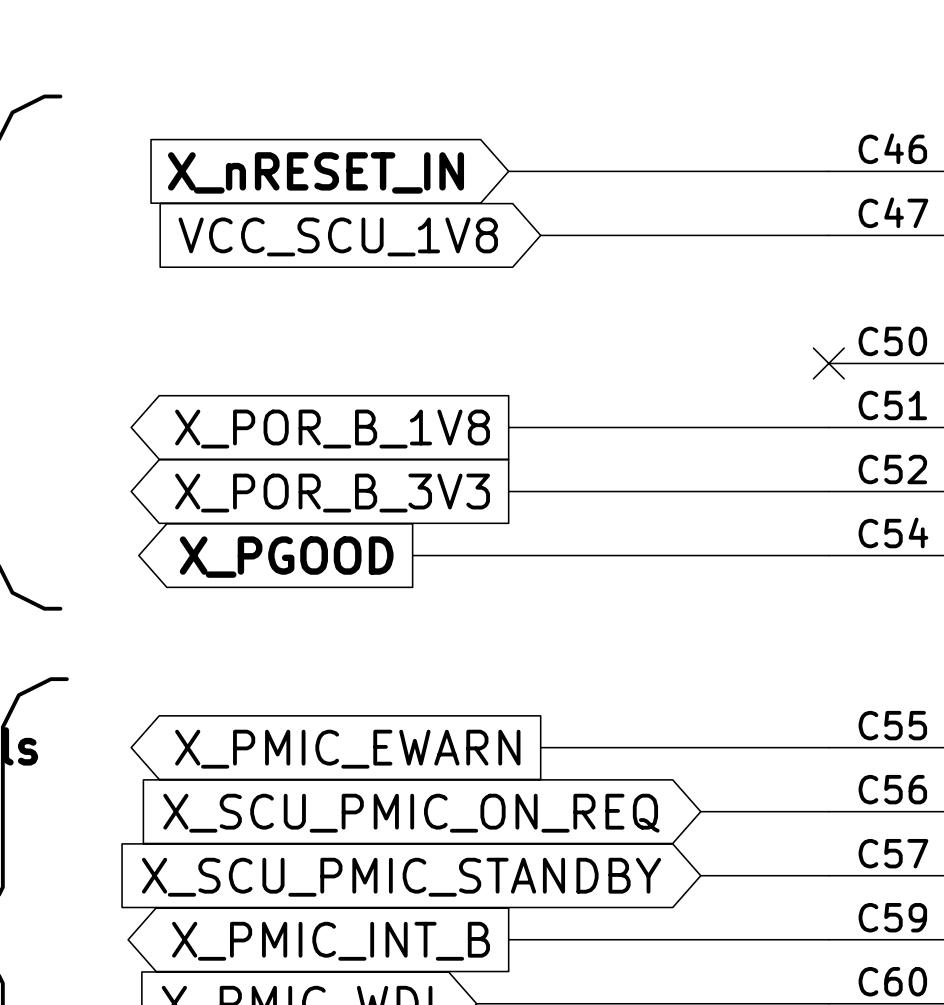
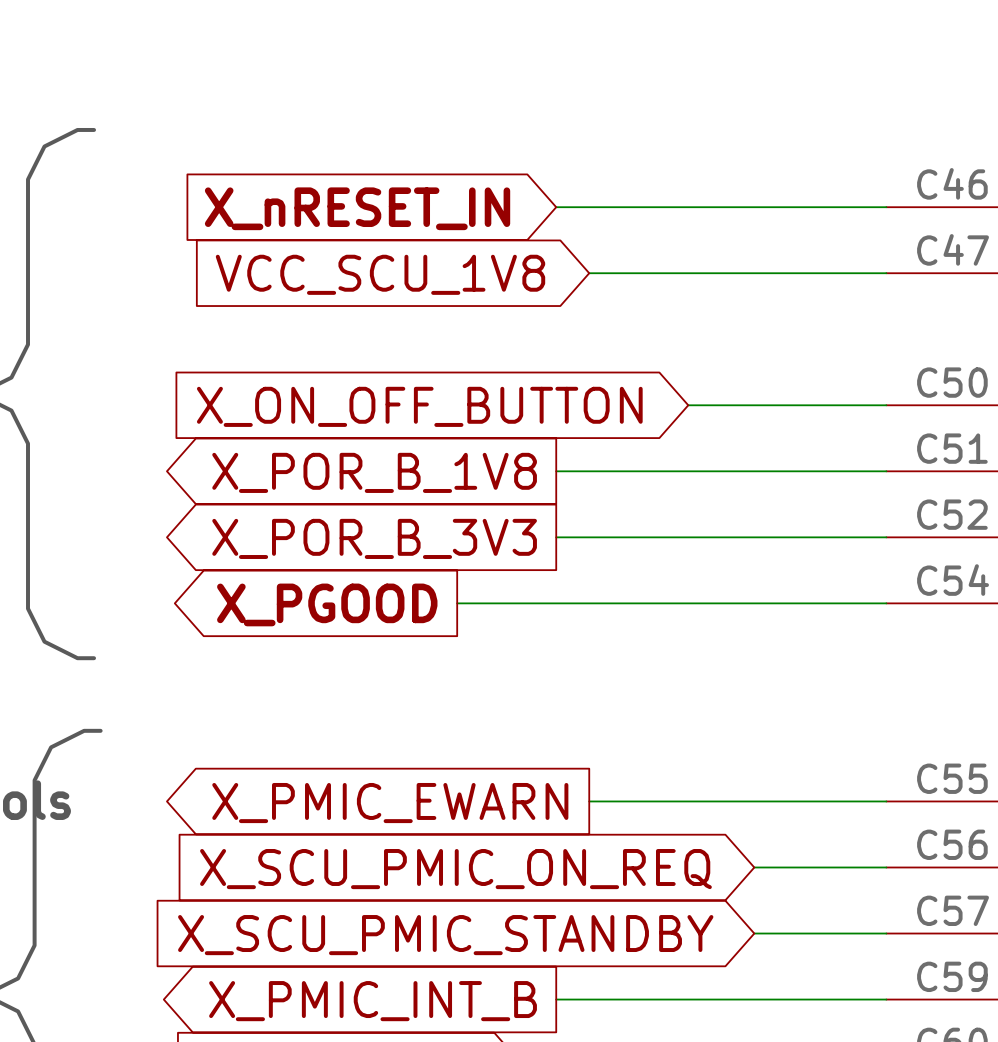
wire: none -> (688, 405) (886, 405)
no-connect mark: (828, 363) -> none
global label: none -> X_ON_OFF_BUTTON (419, 406)

